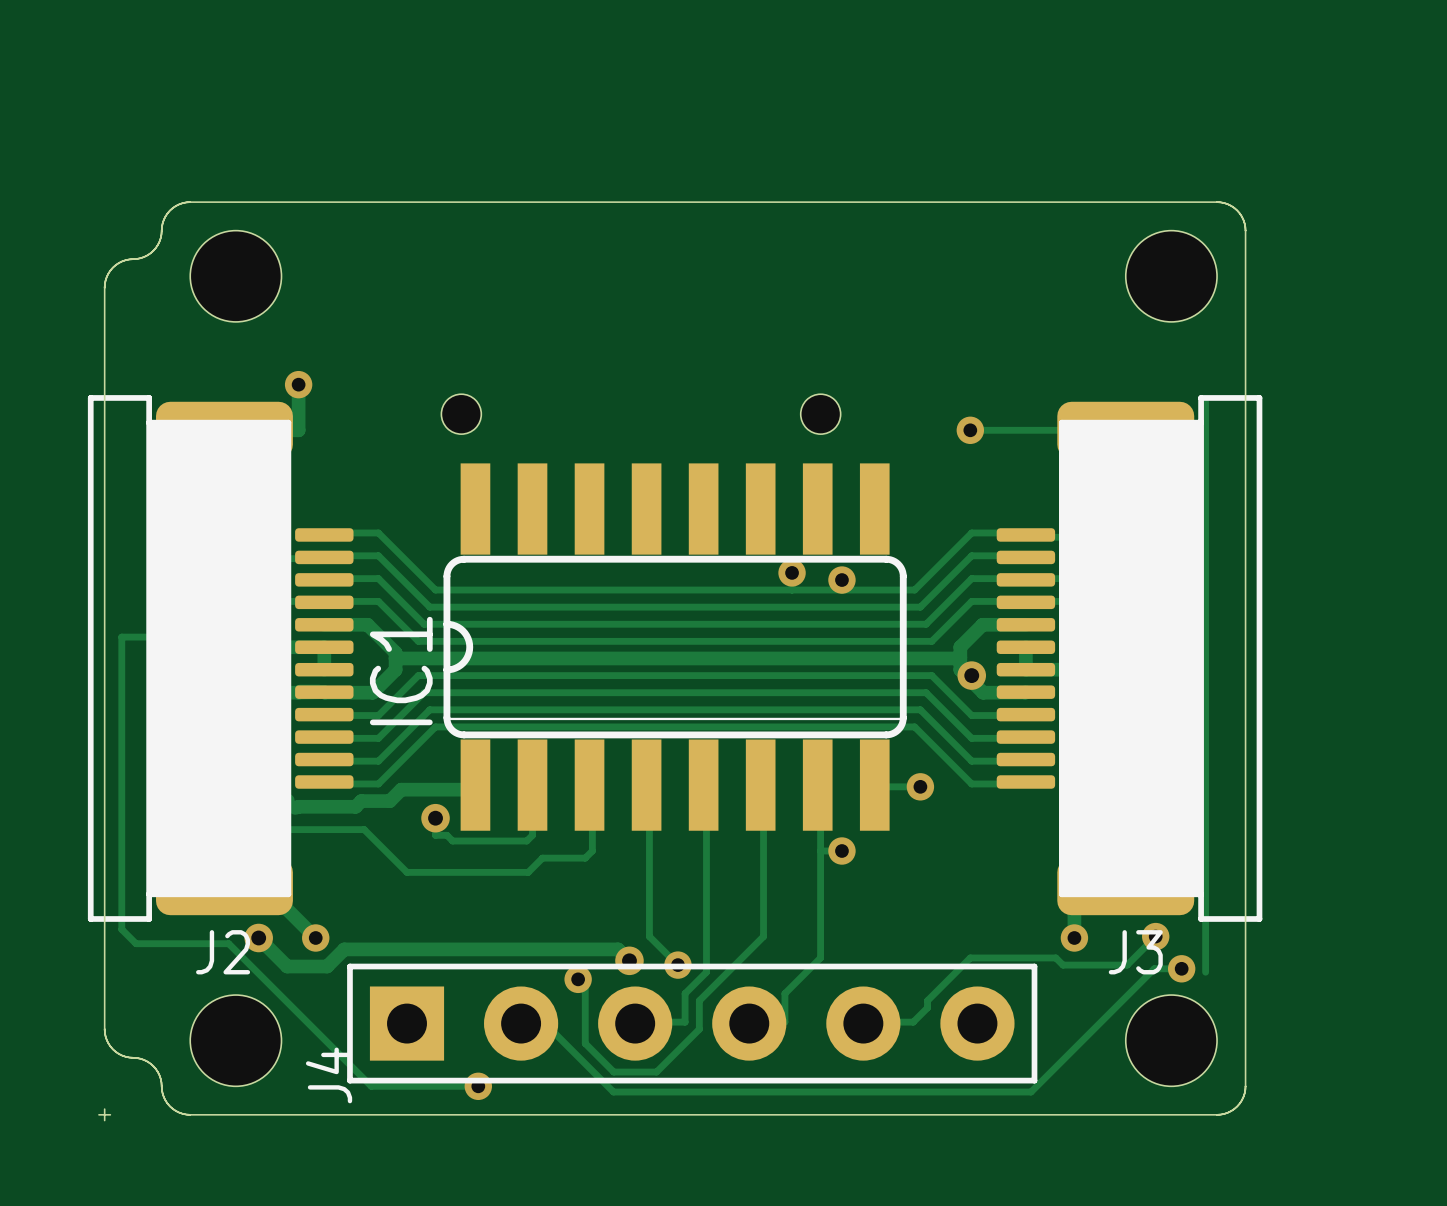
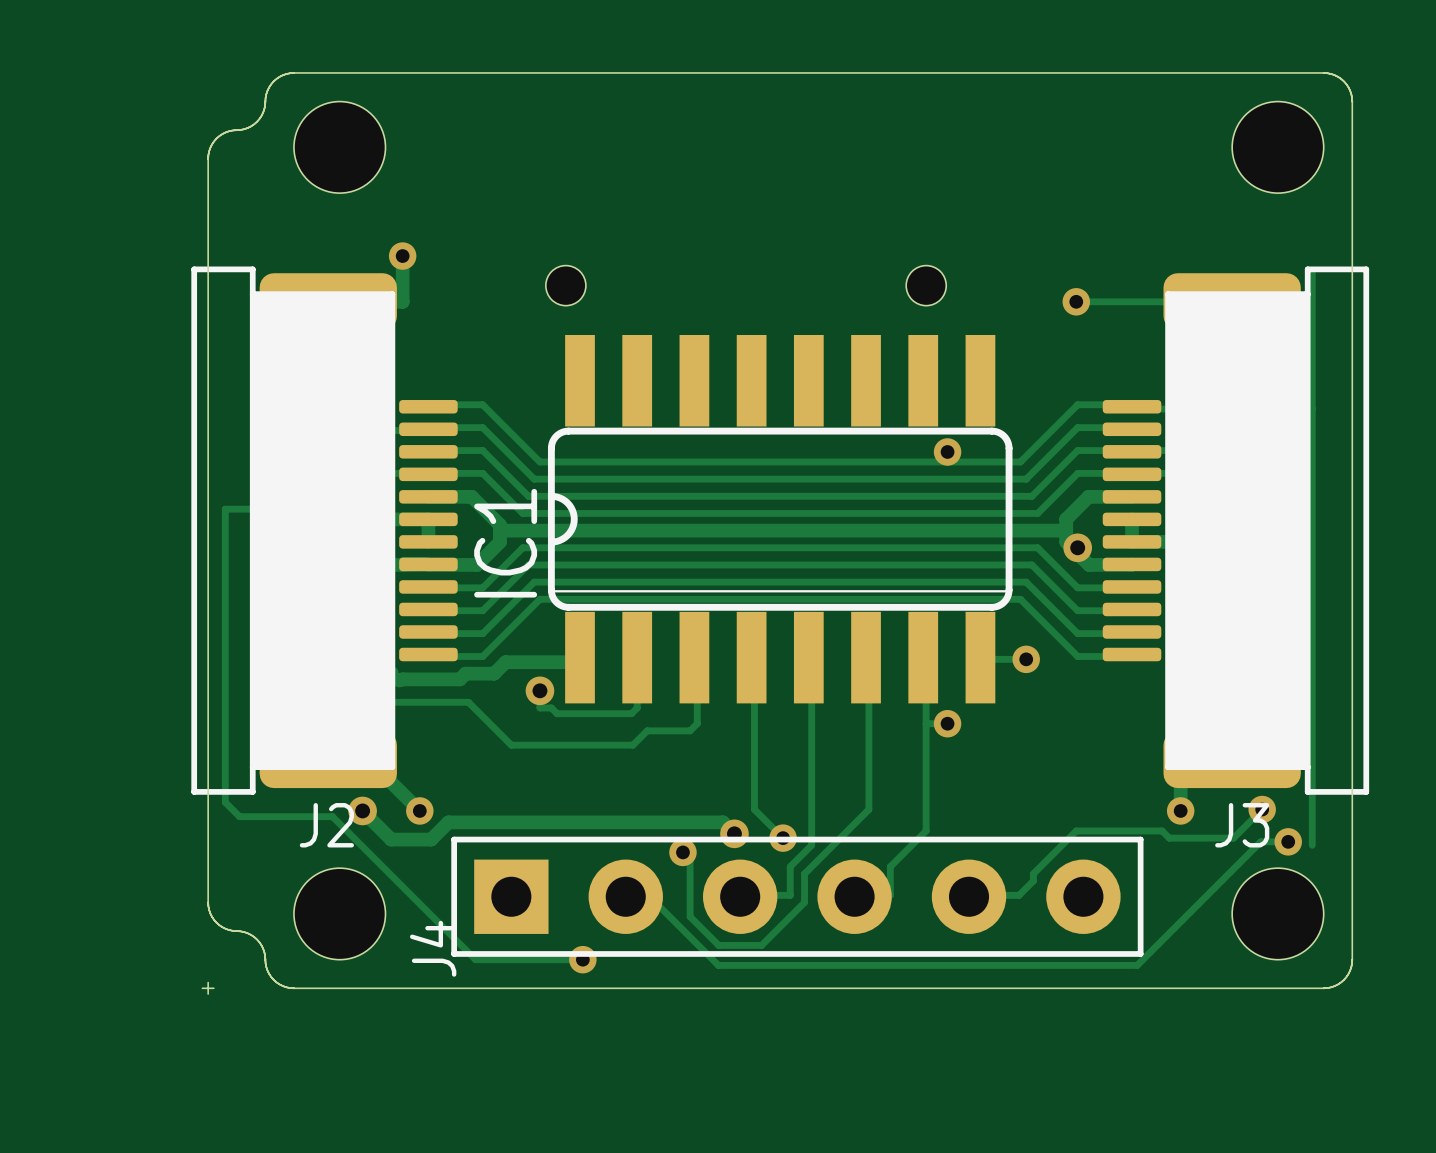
via: (792, 572) -> none

